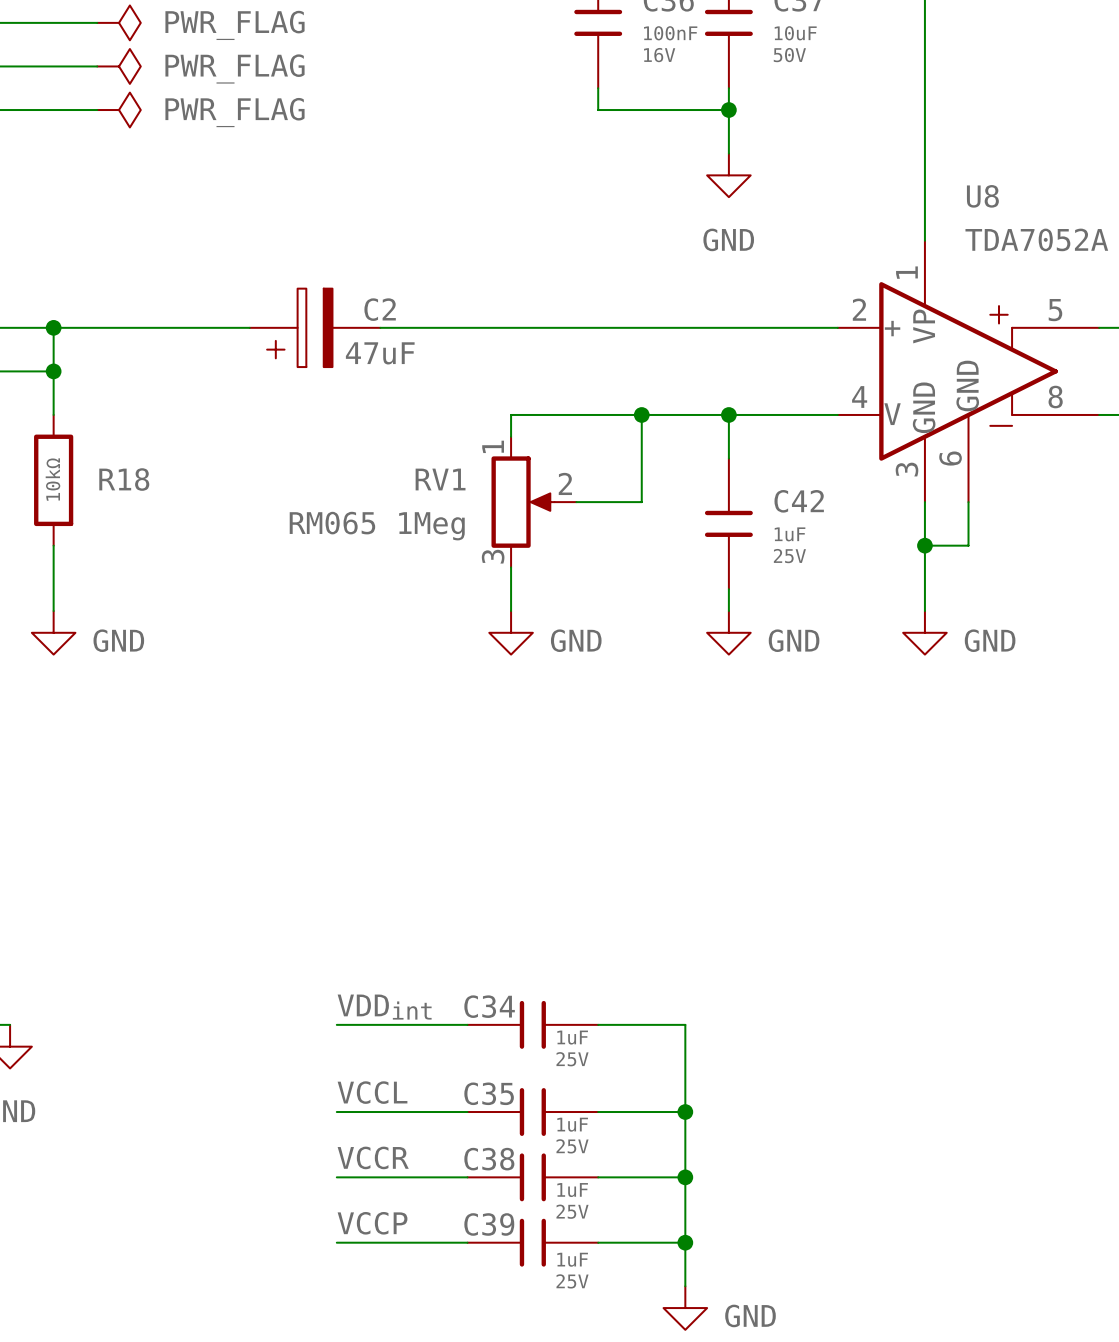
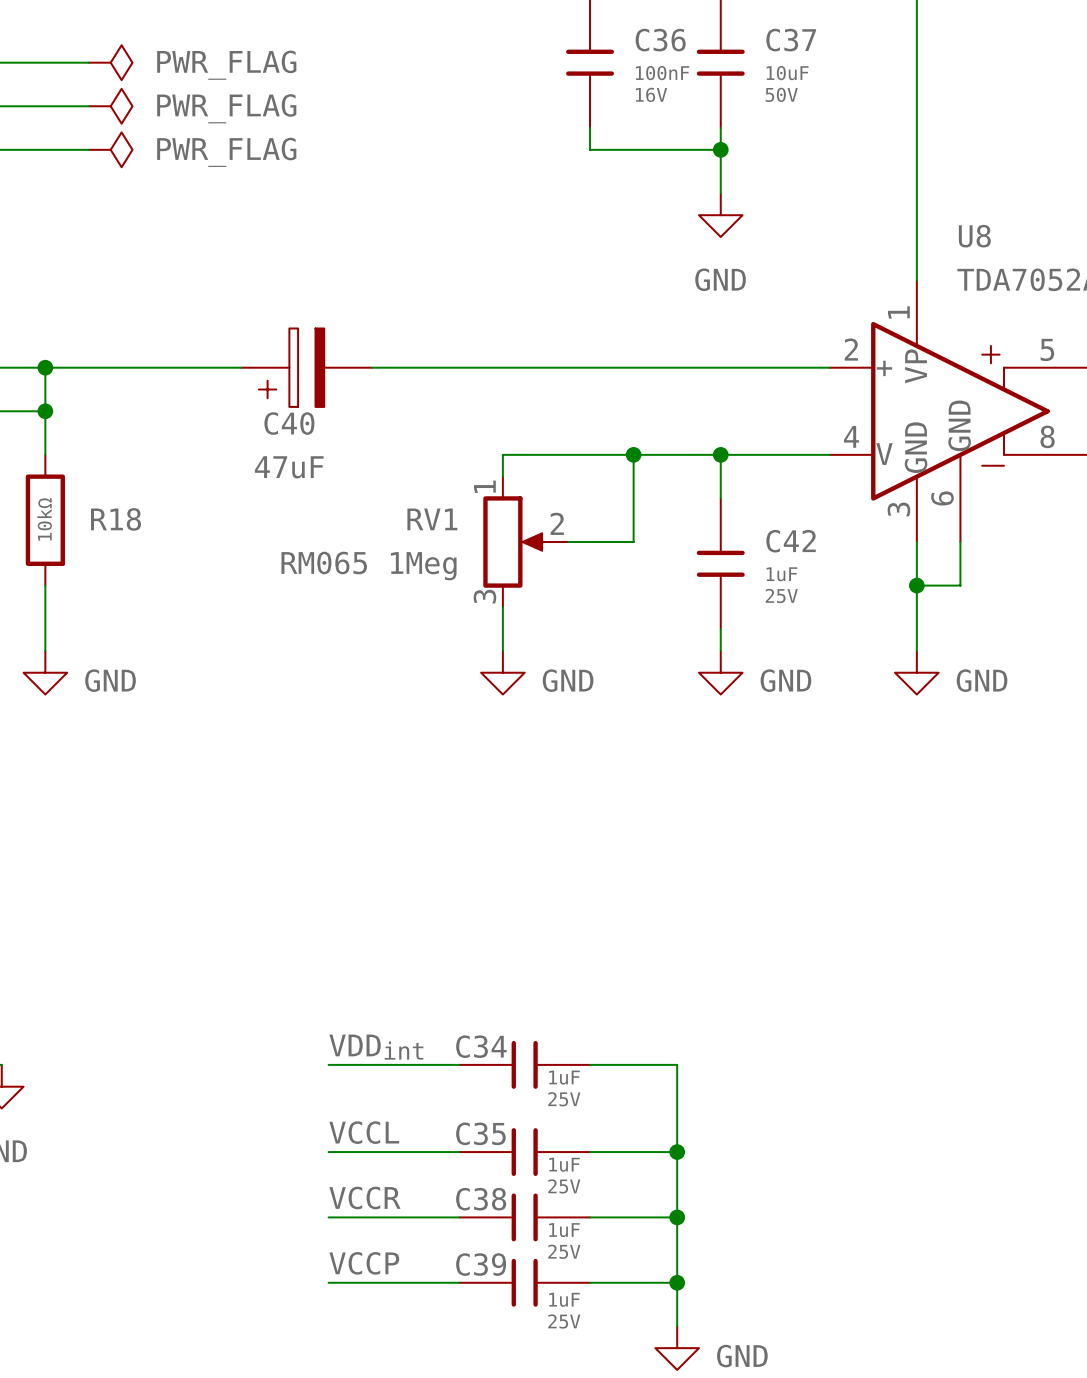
C2 name: C2 (380, 309) -> C40 (289, 423)
C2 value position: 47uF (380, 353) -> 47uF (289, 467)

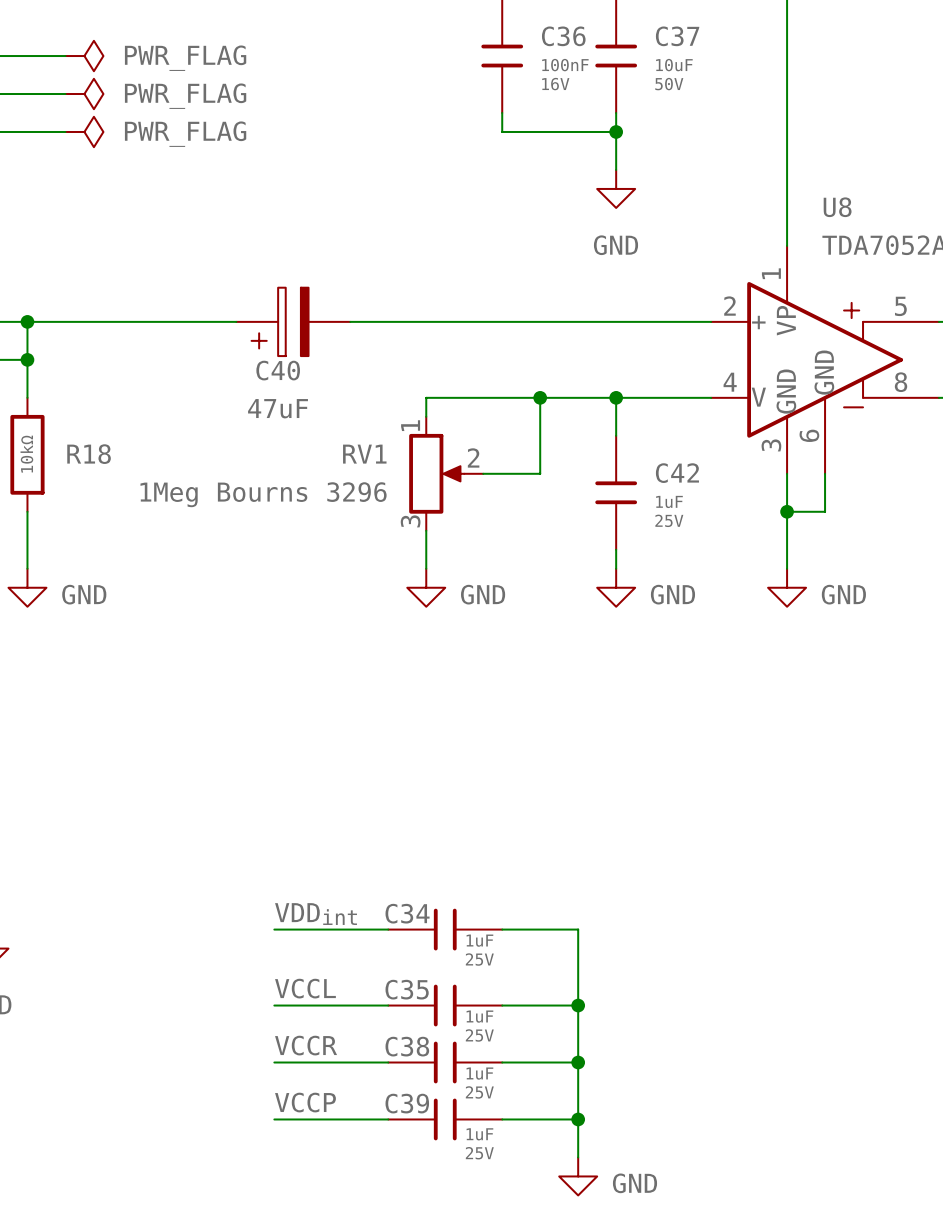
C40 position: (306, 367) -> (293, 321)
RV1 value: RM065 1Meg (369, 566) -> 1Meg Bourns 3296 (263, 494)

